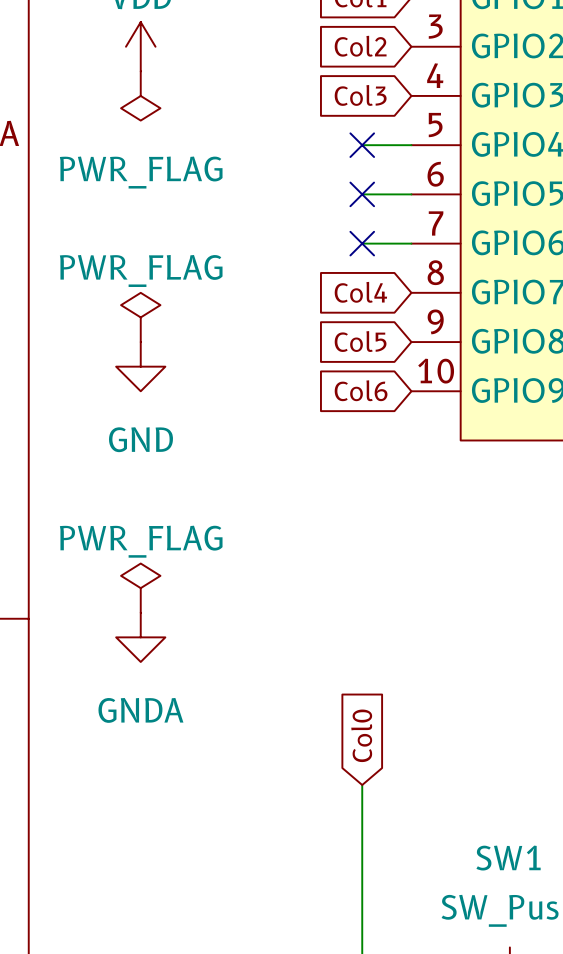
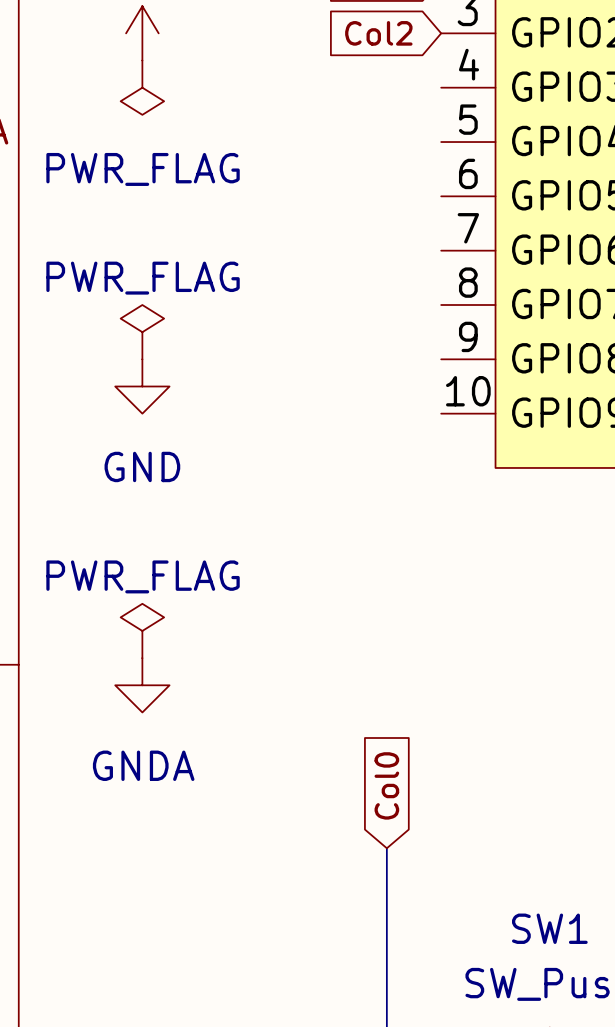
global label: Col3 (360, 95) -> none
wire: (362, 145) (411, 145) -> none
no-connect mark: (362, 145) -> none
wire: (362, 194) (411, 194) -> none
no-connect mark: (362, 194) -> none
wire: (362, 243) (411, 243) -> none
no-connect mark: (362, 243) -> none
global label: Col4 (360, 292) -> none
global label: Col5 (360, 341) -> none
global label: Col6 (361, 390) -> none

